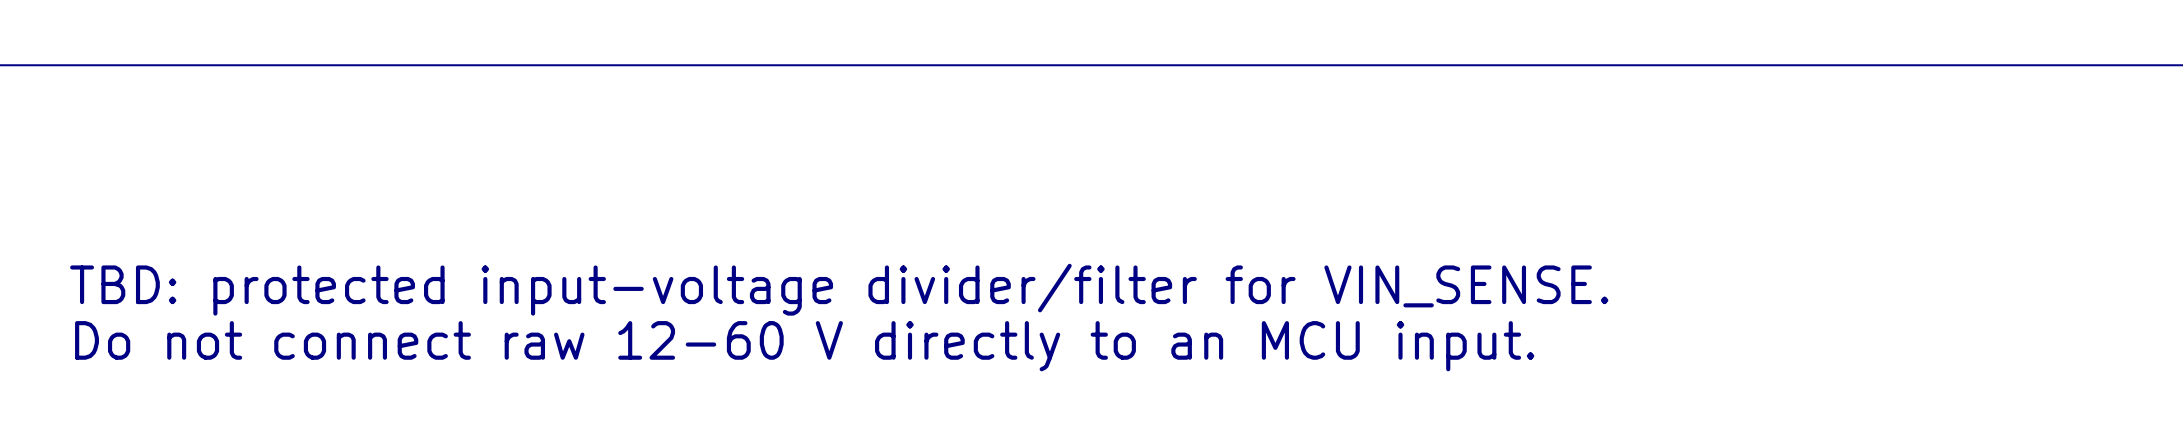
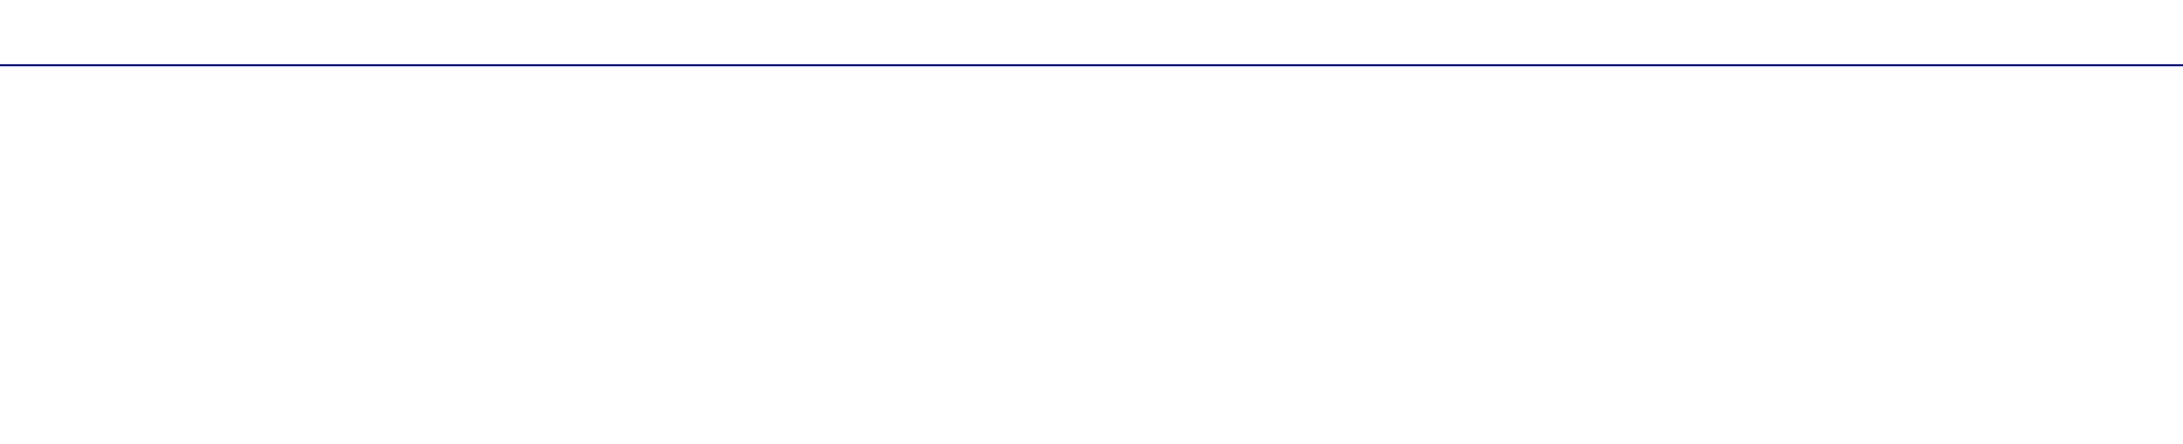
text: TBD: protected input-voltage divider/filter for VIN_SENSE. (839, 289) -> none
text: Do not connect raw 12-60 V directly to an MCU input. (804, 346) -> none

